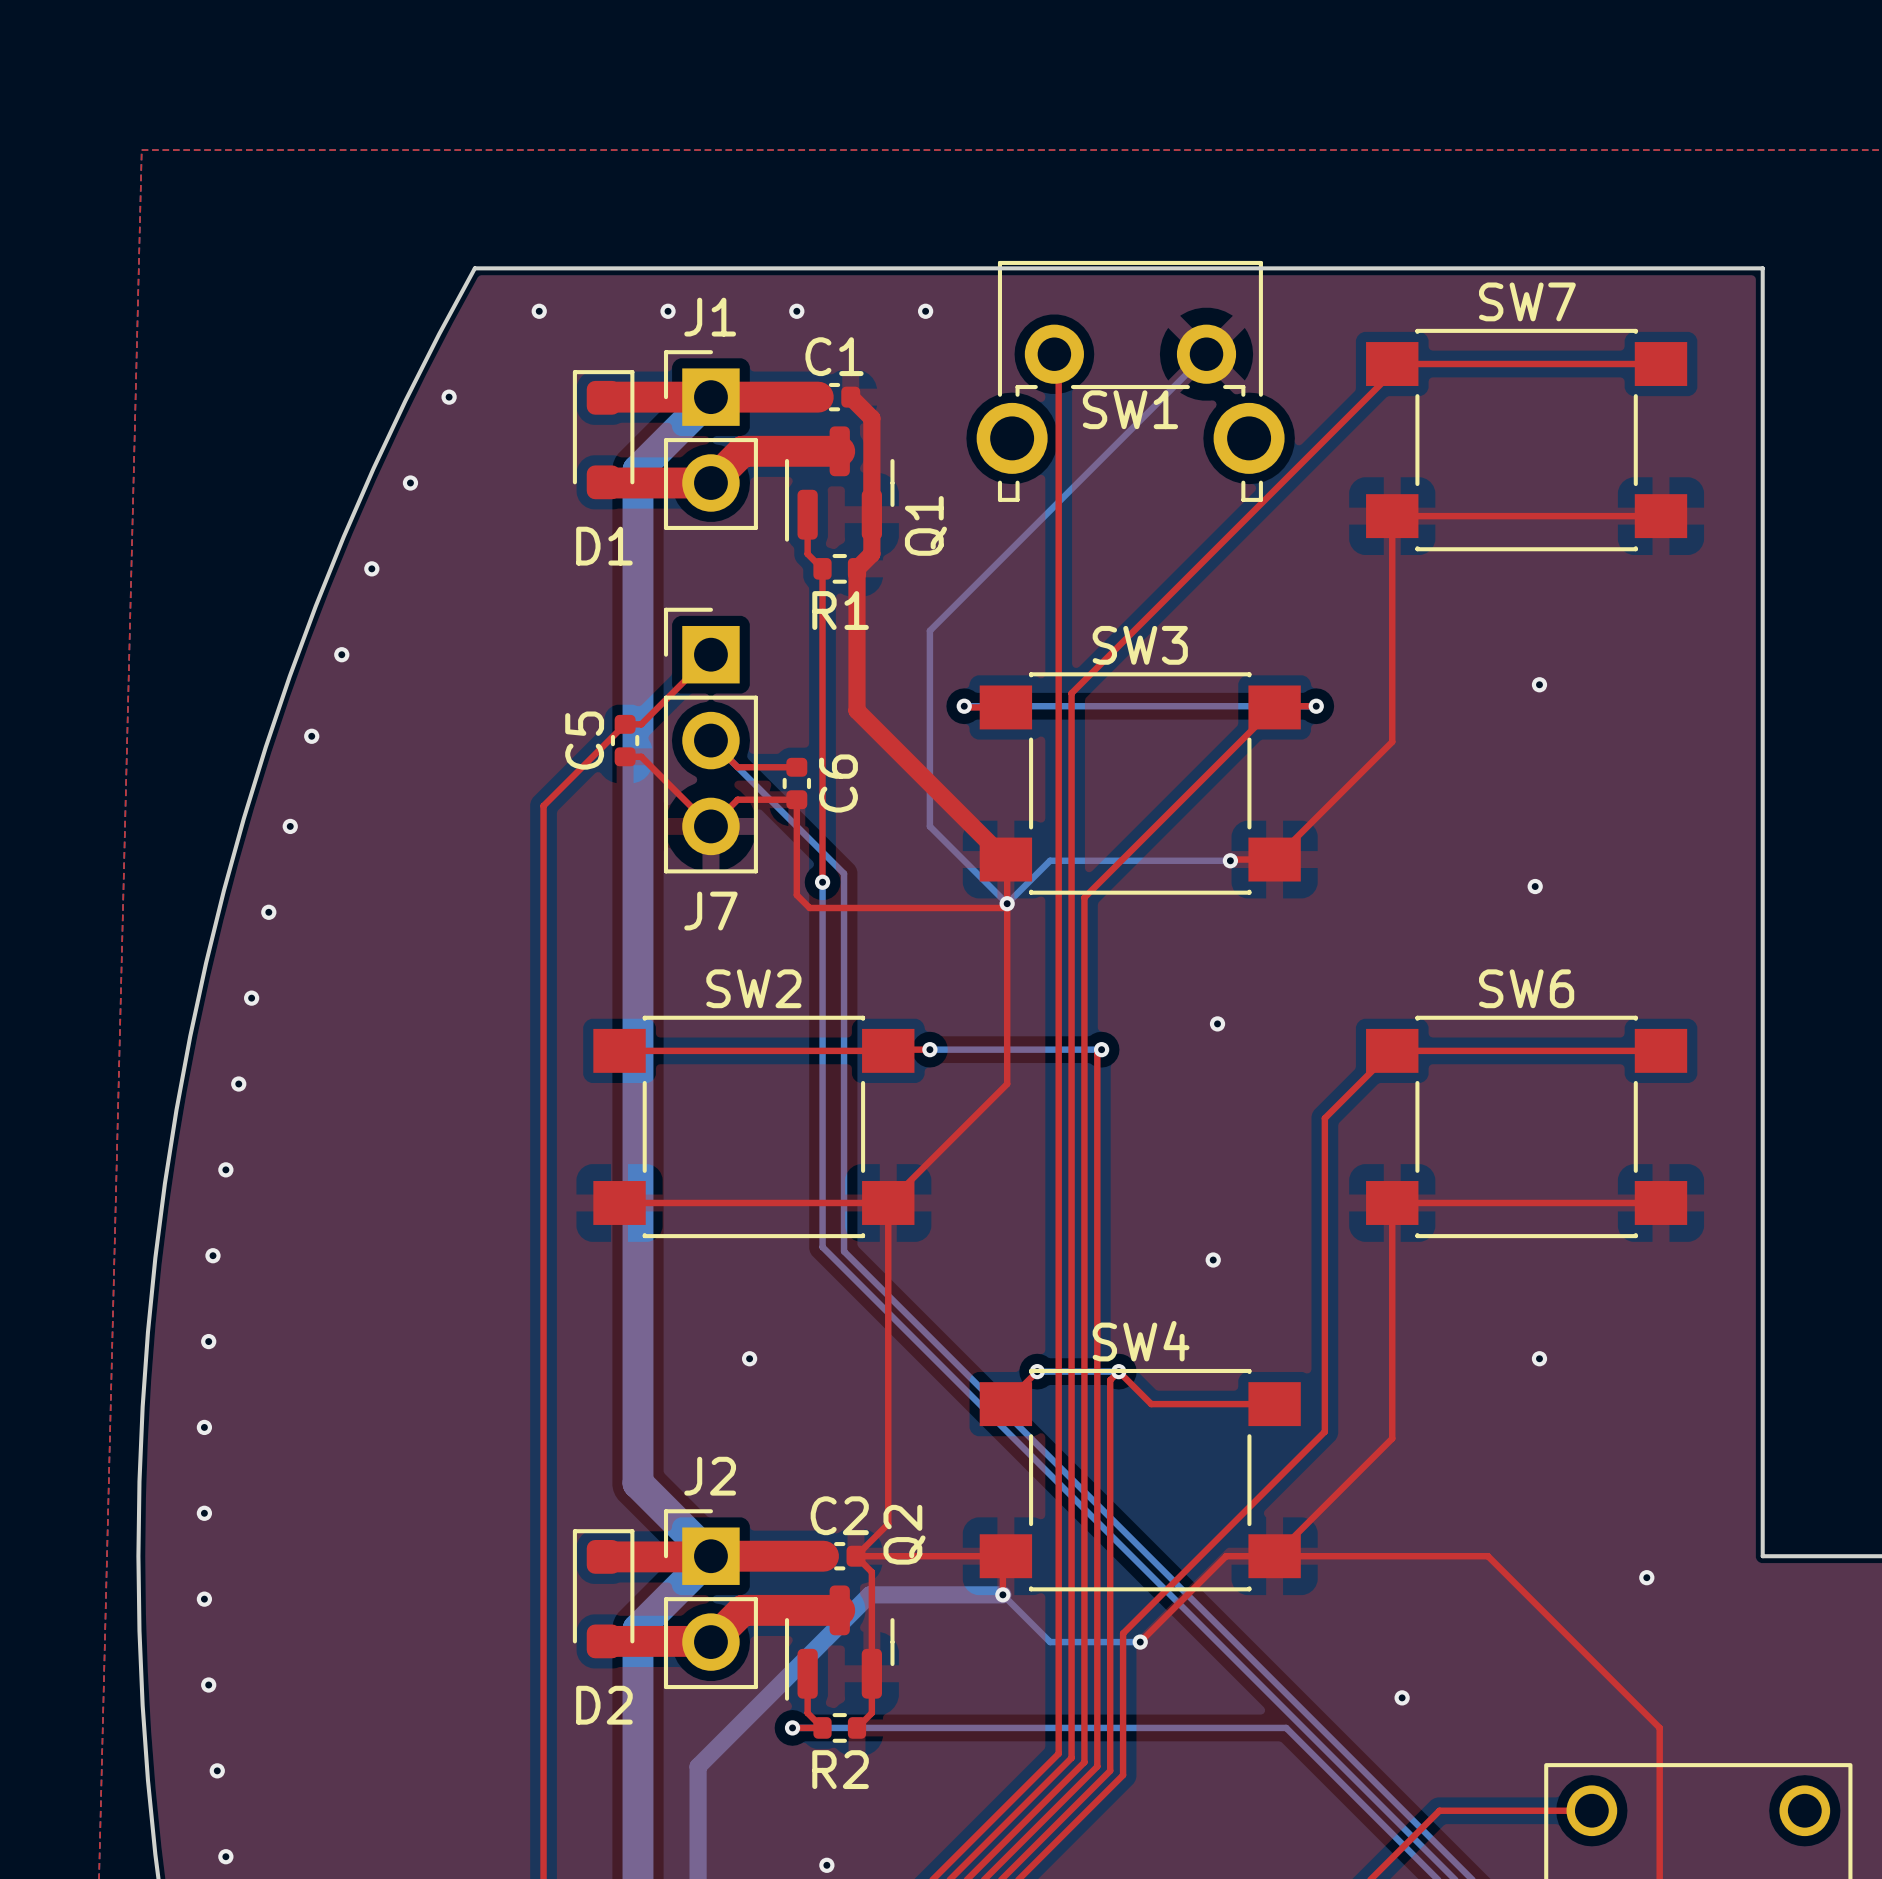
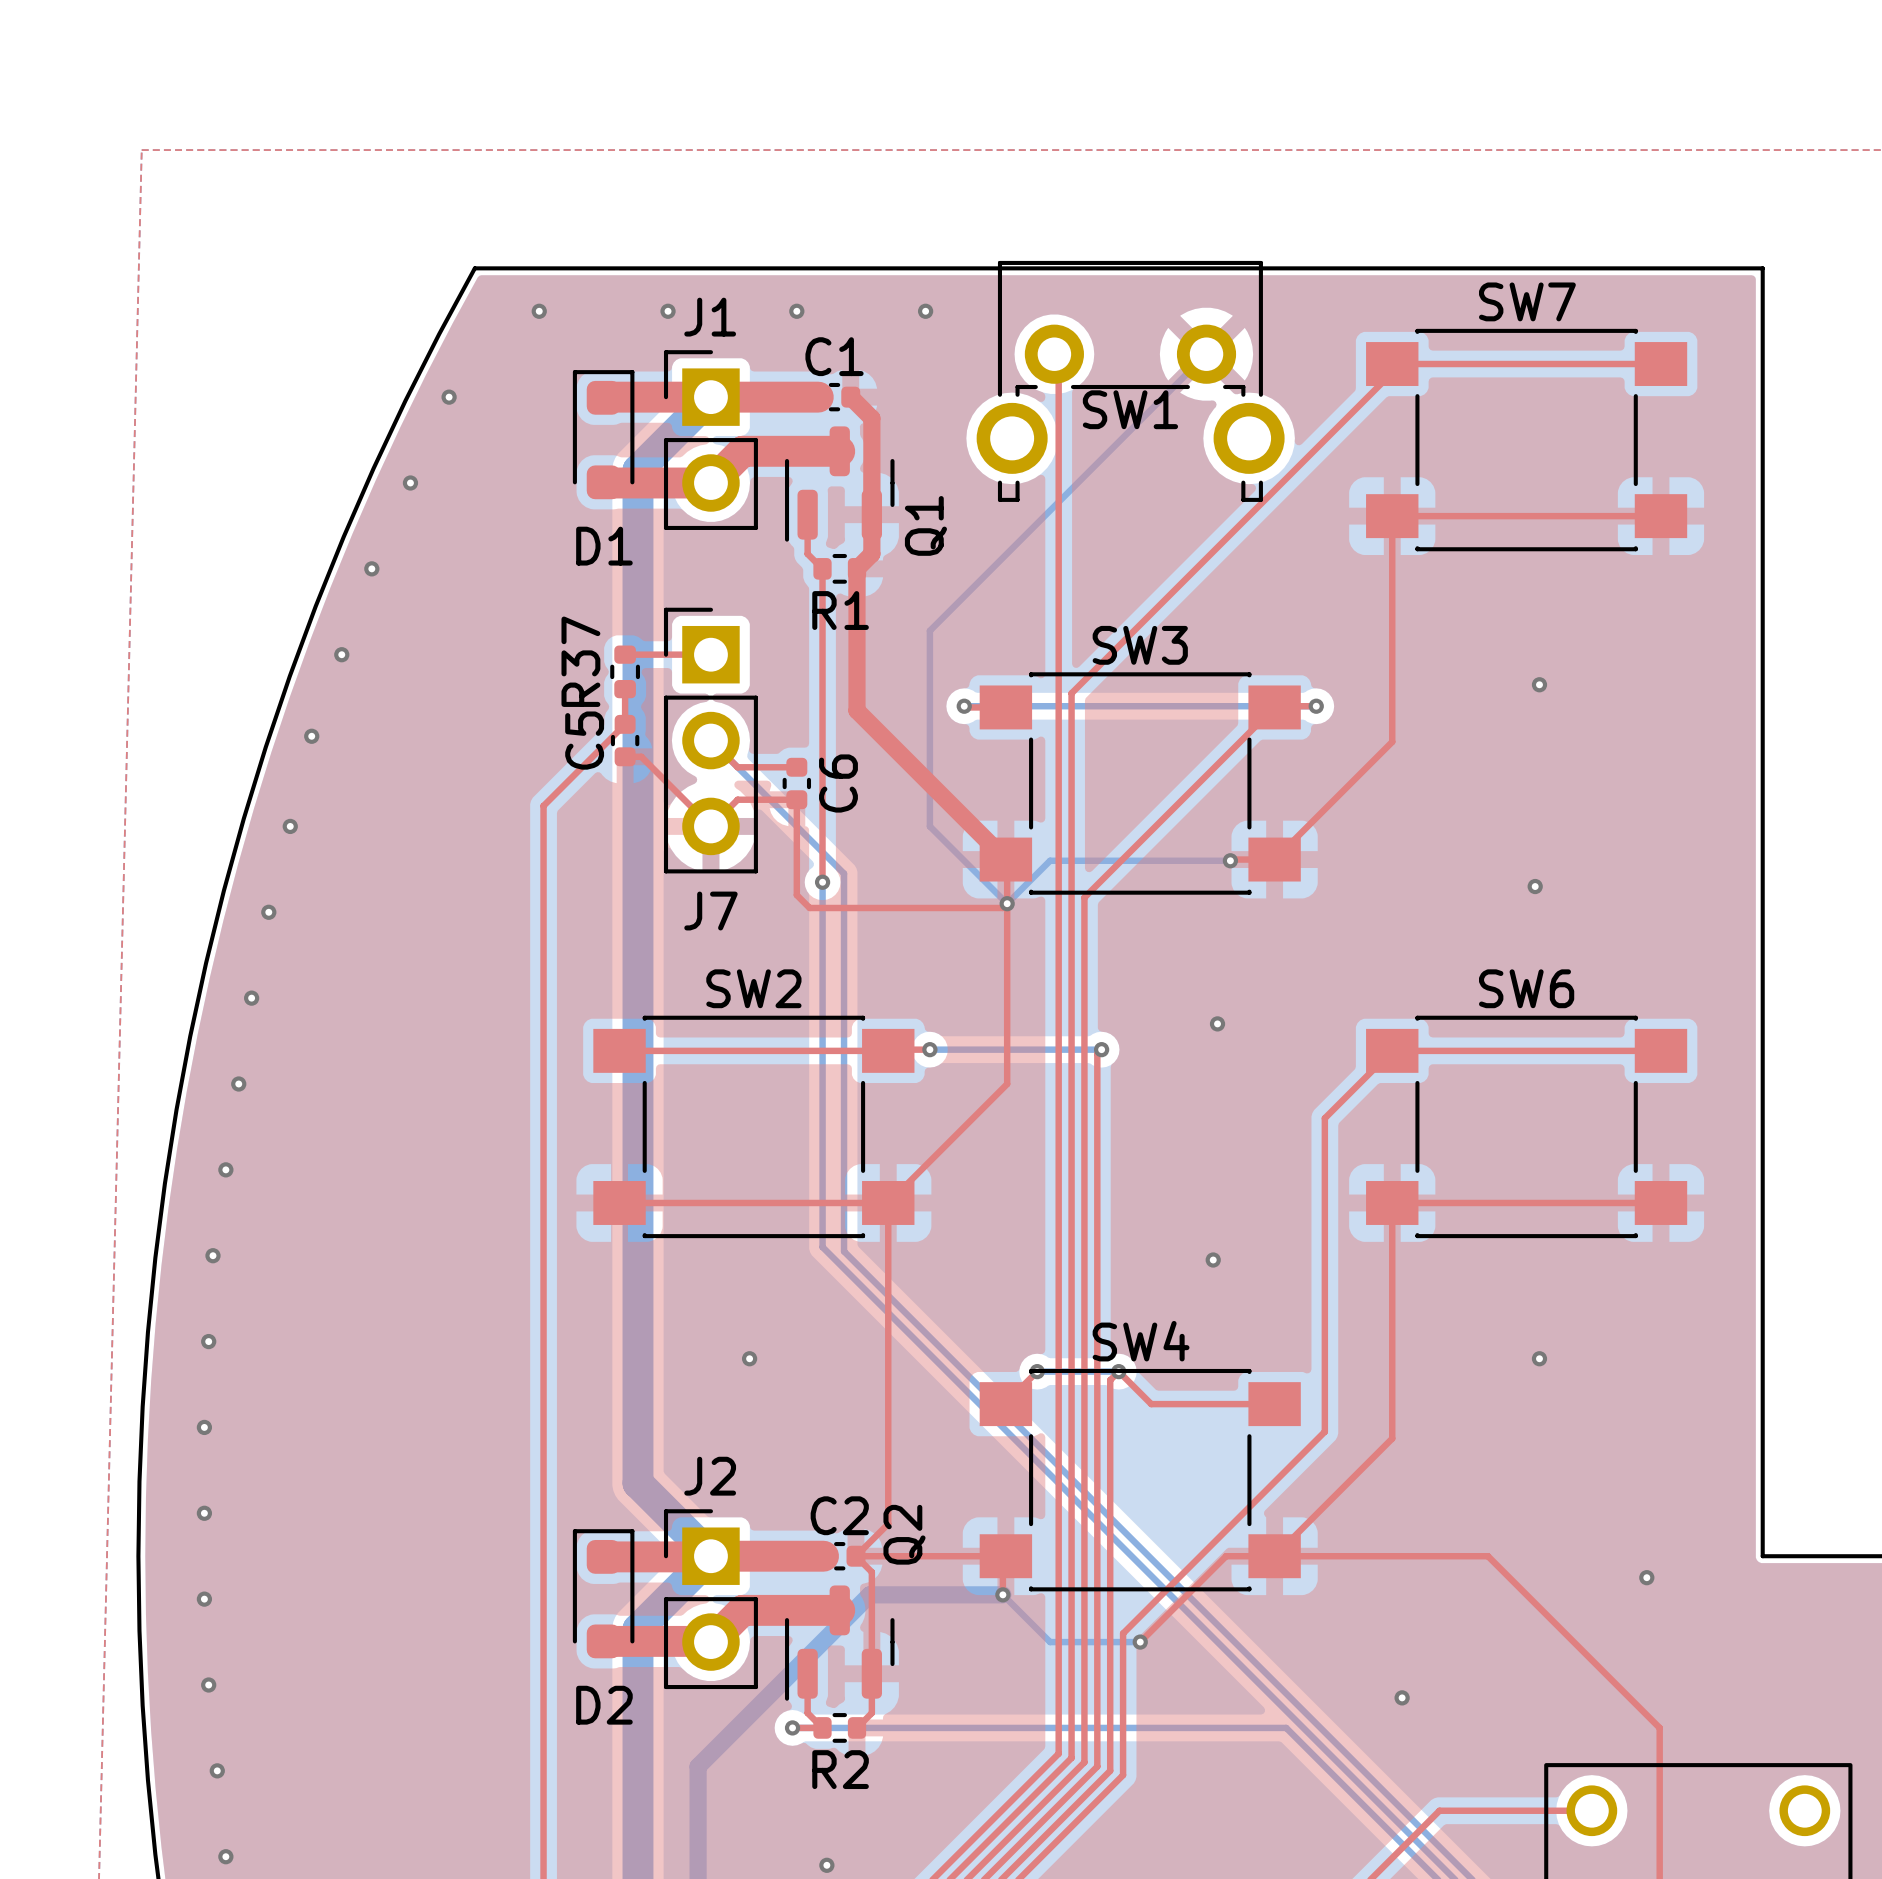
top track: (710, 654) (641, 724) (625, 724) -> (710, 654) (625, 654)
R37: none -> (625, 671)
top track: none -> (625, 689) (625, 724)

